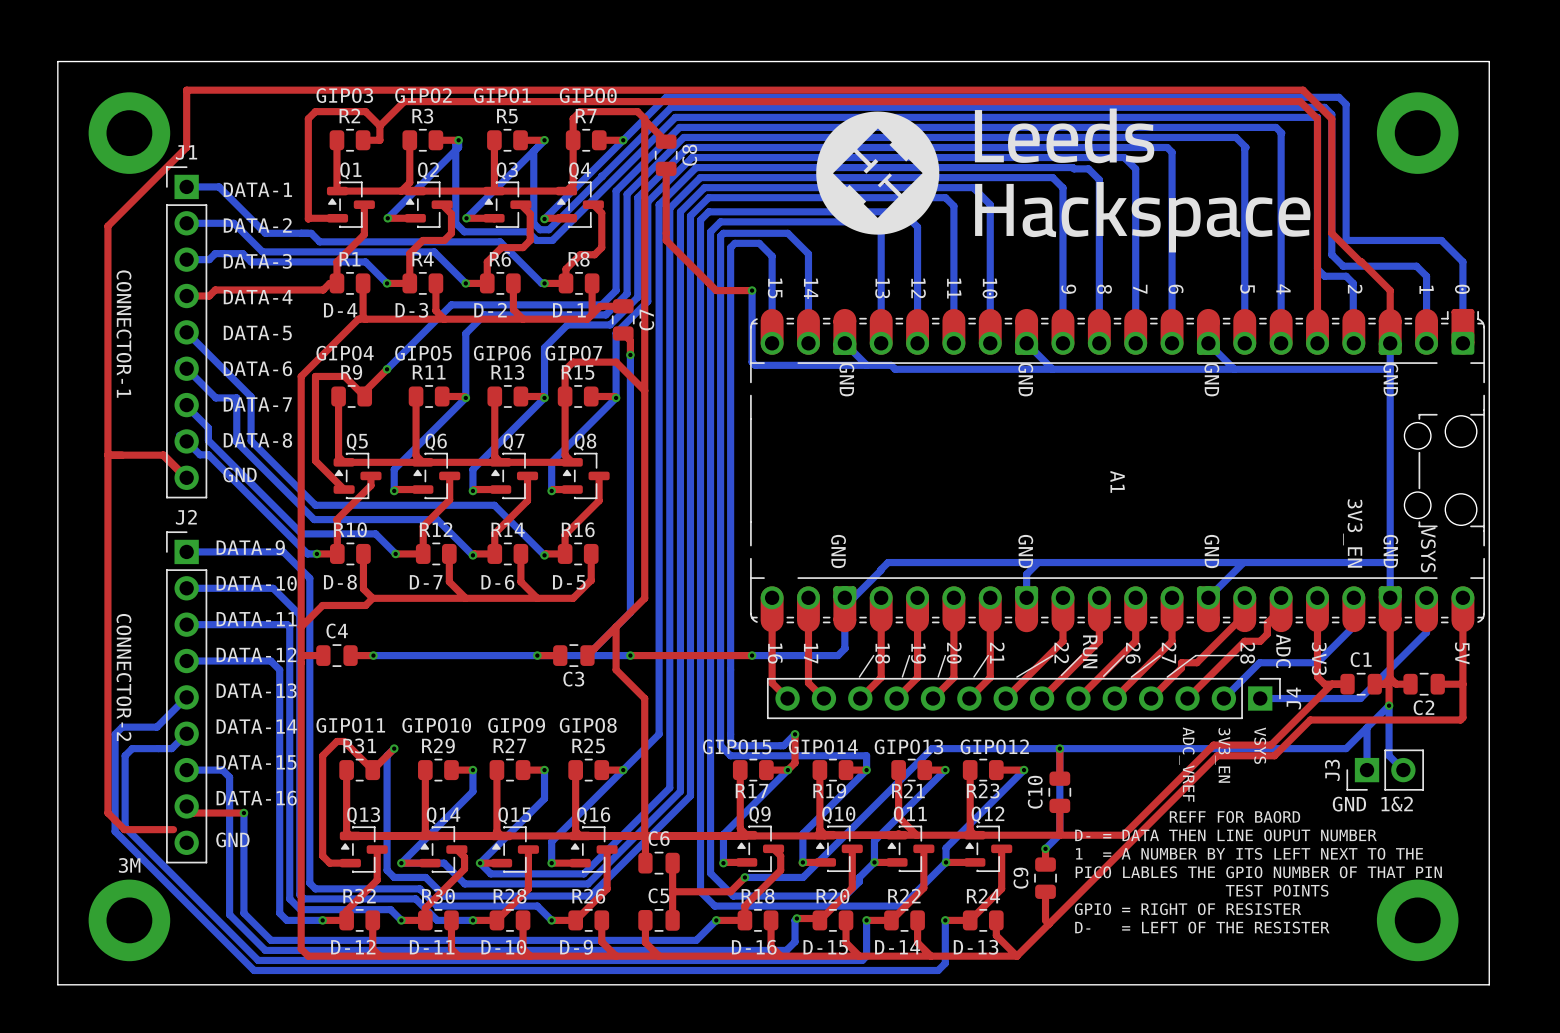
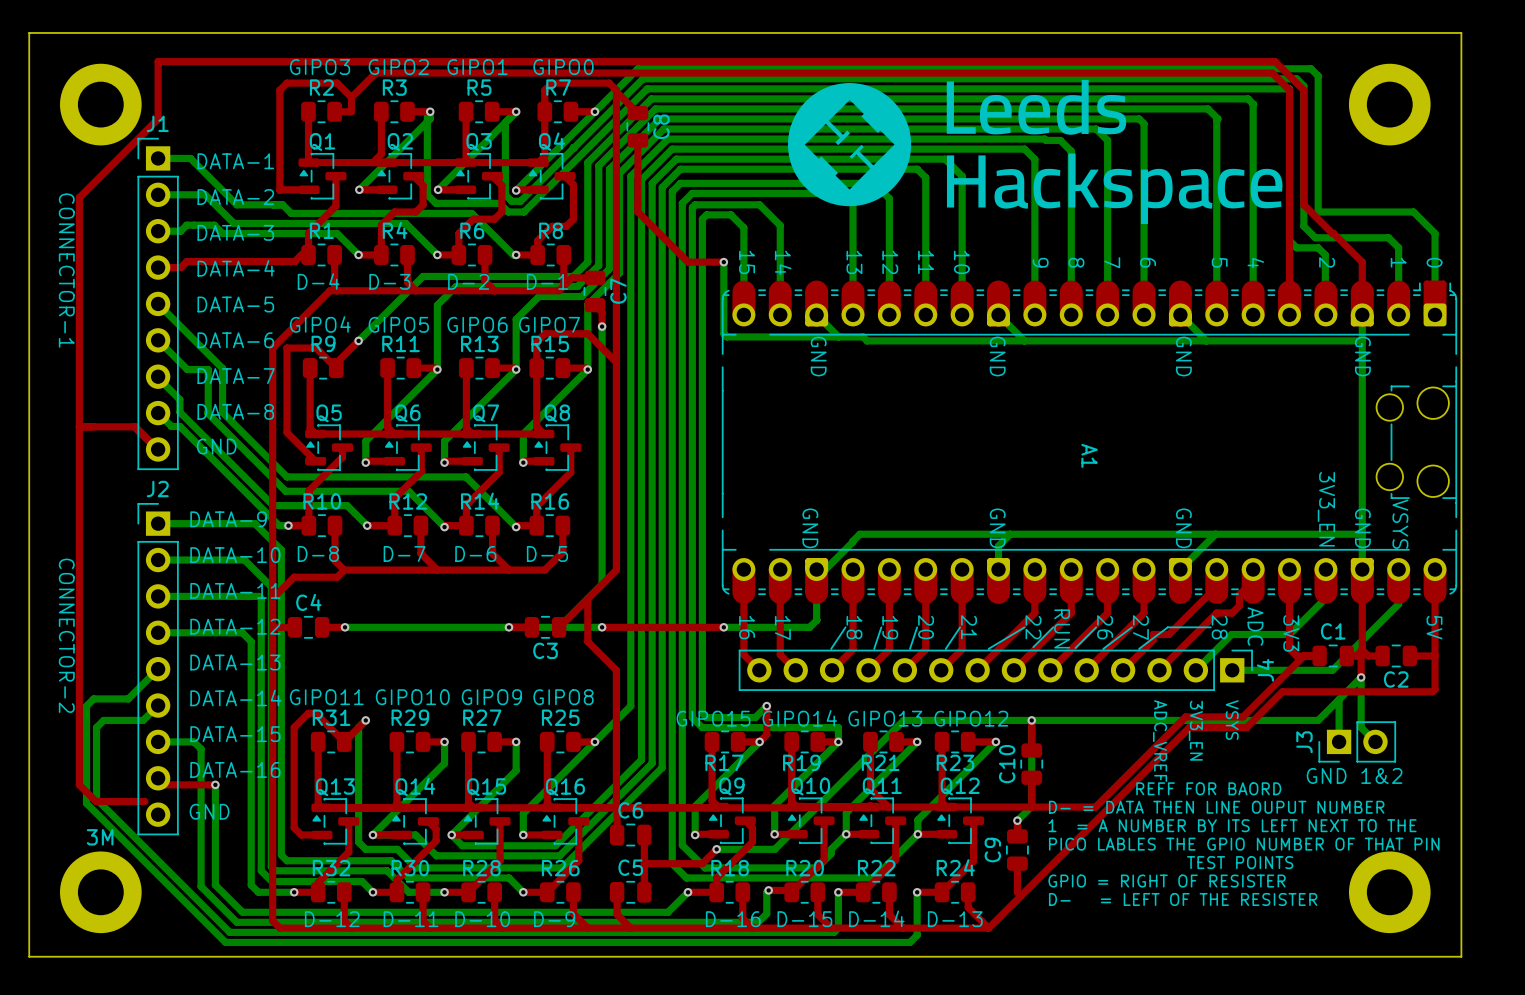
text position: CONNECTOR-1 (123, 334) -> CONNECTOR-1 (66, 270)
text position: CONNECTOR-2 (123, 677) -> CONNECTOR-2 (66, 635)

